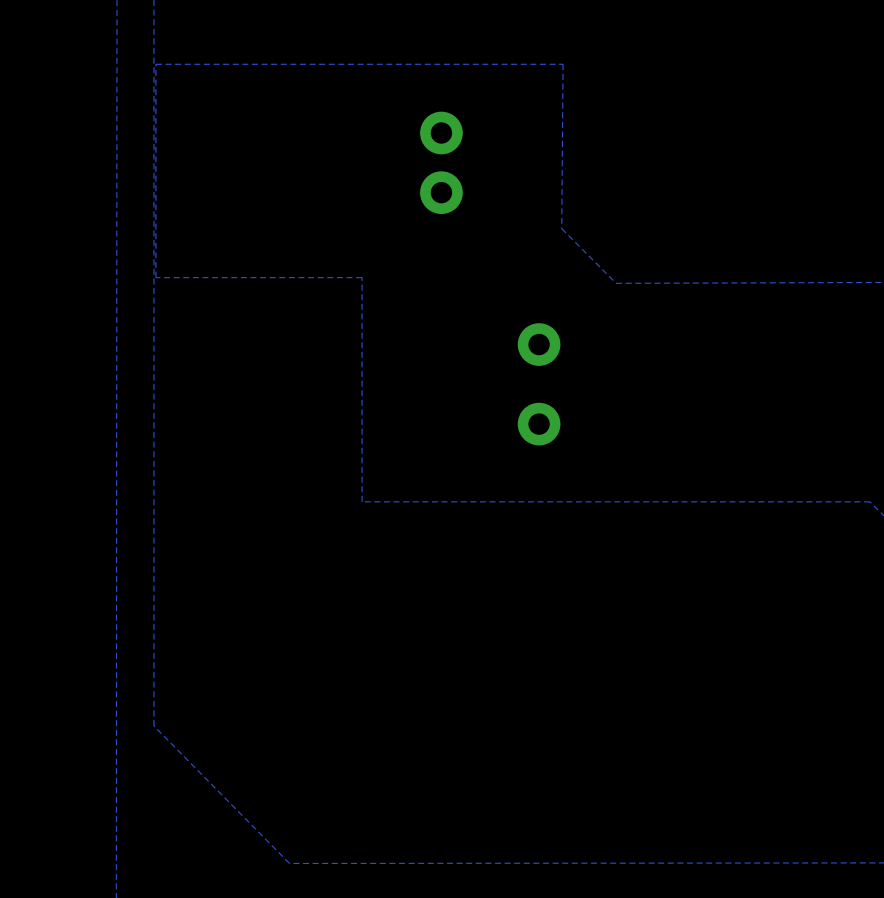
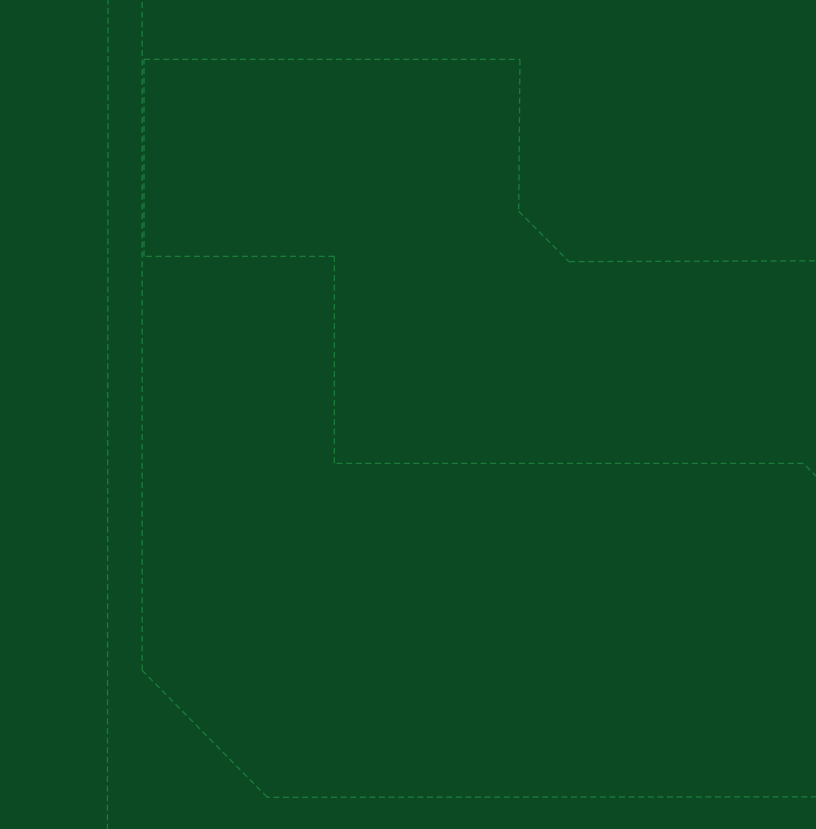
via: (441, 133) -> none
via: (441, 192) -> none
via: (539, 344) -> none
via: (539, 424) -> none

